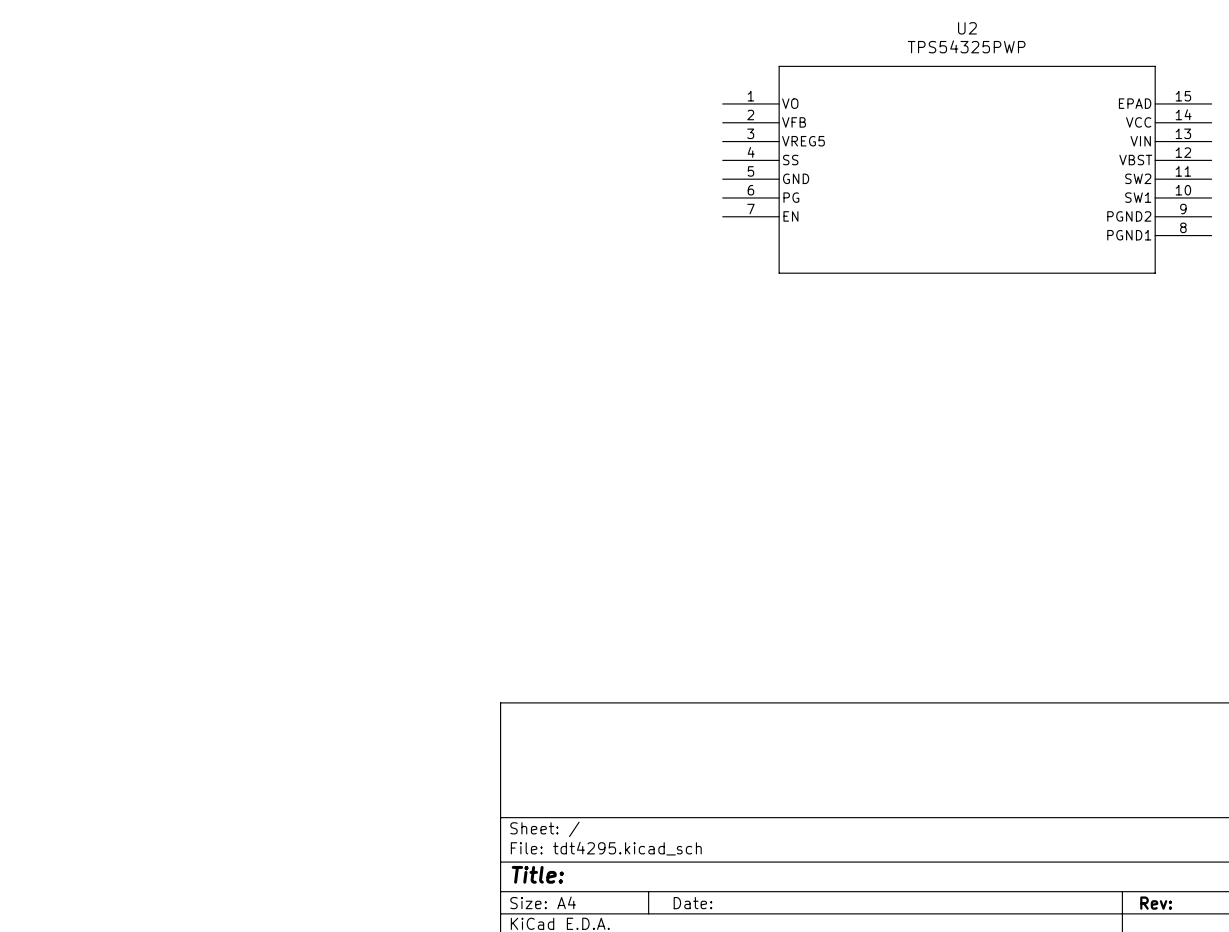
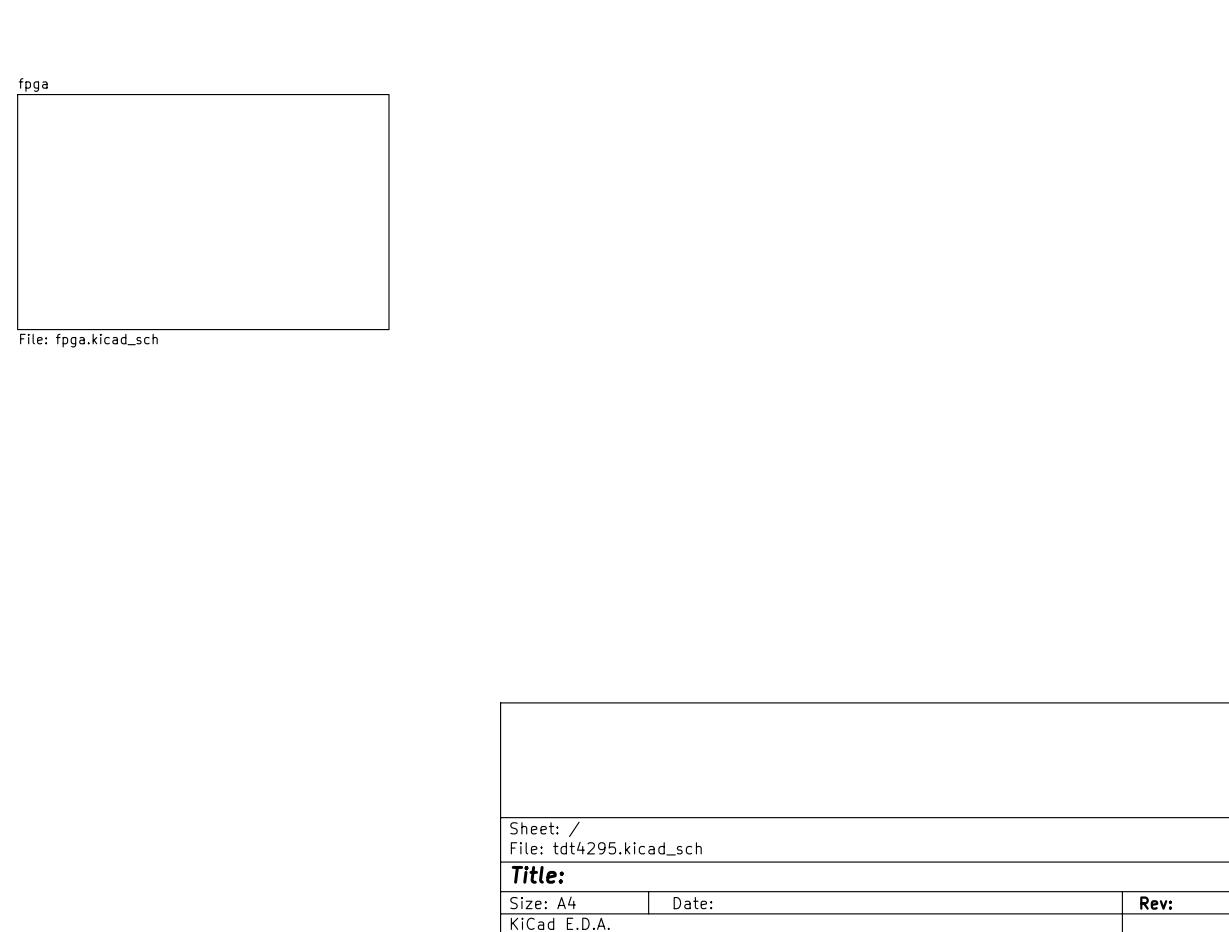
U2: TPS54325PWP (967, 169) -> none
sheet fpga: none -> File: fpga.kicad_sch (203, 212)

